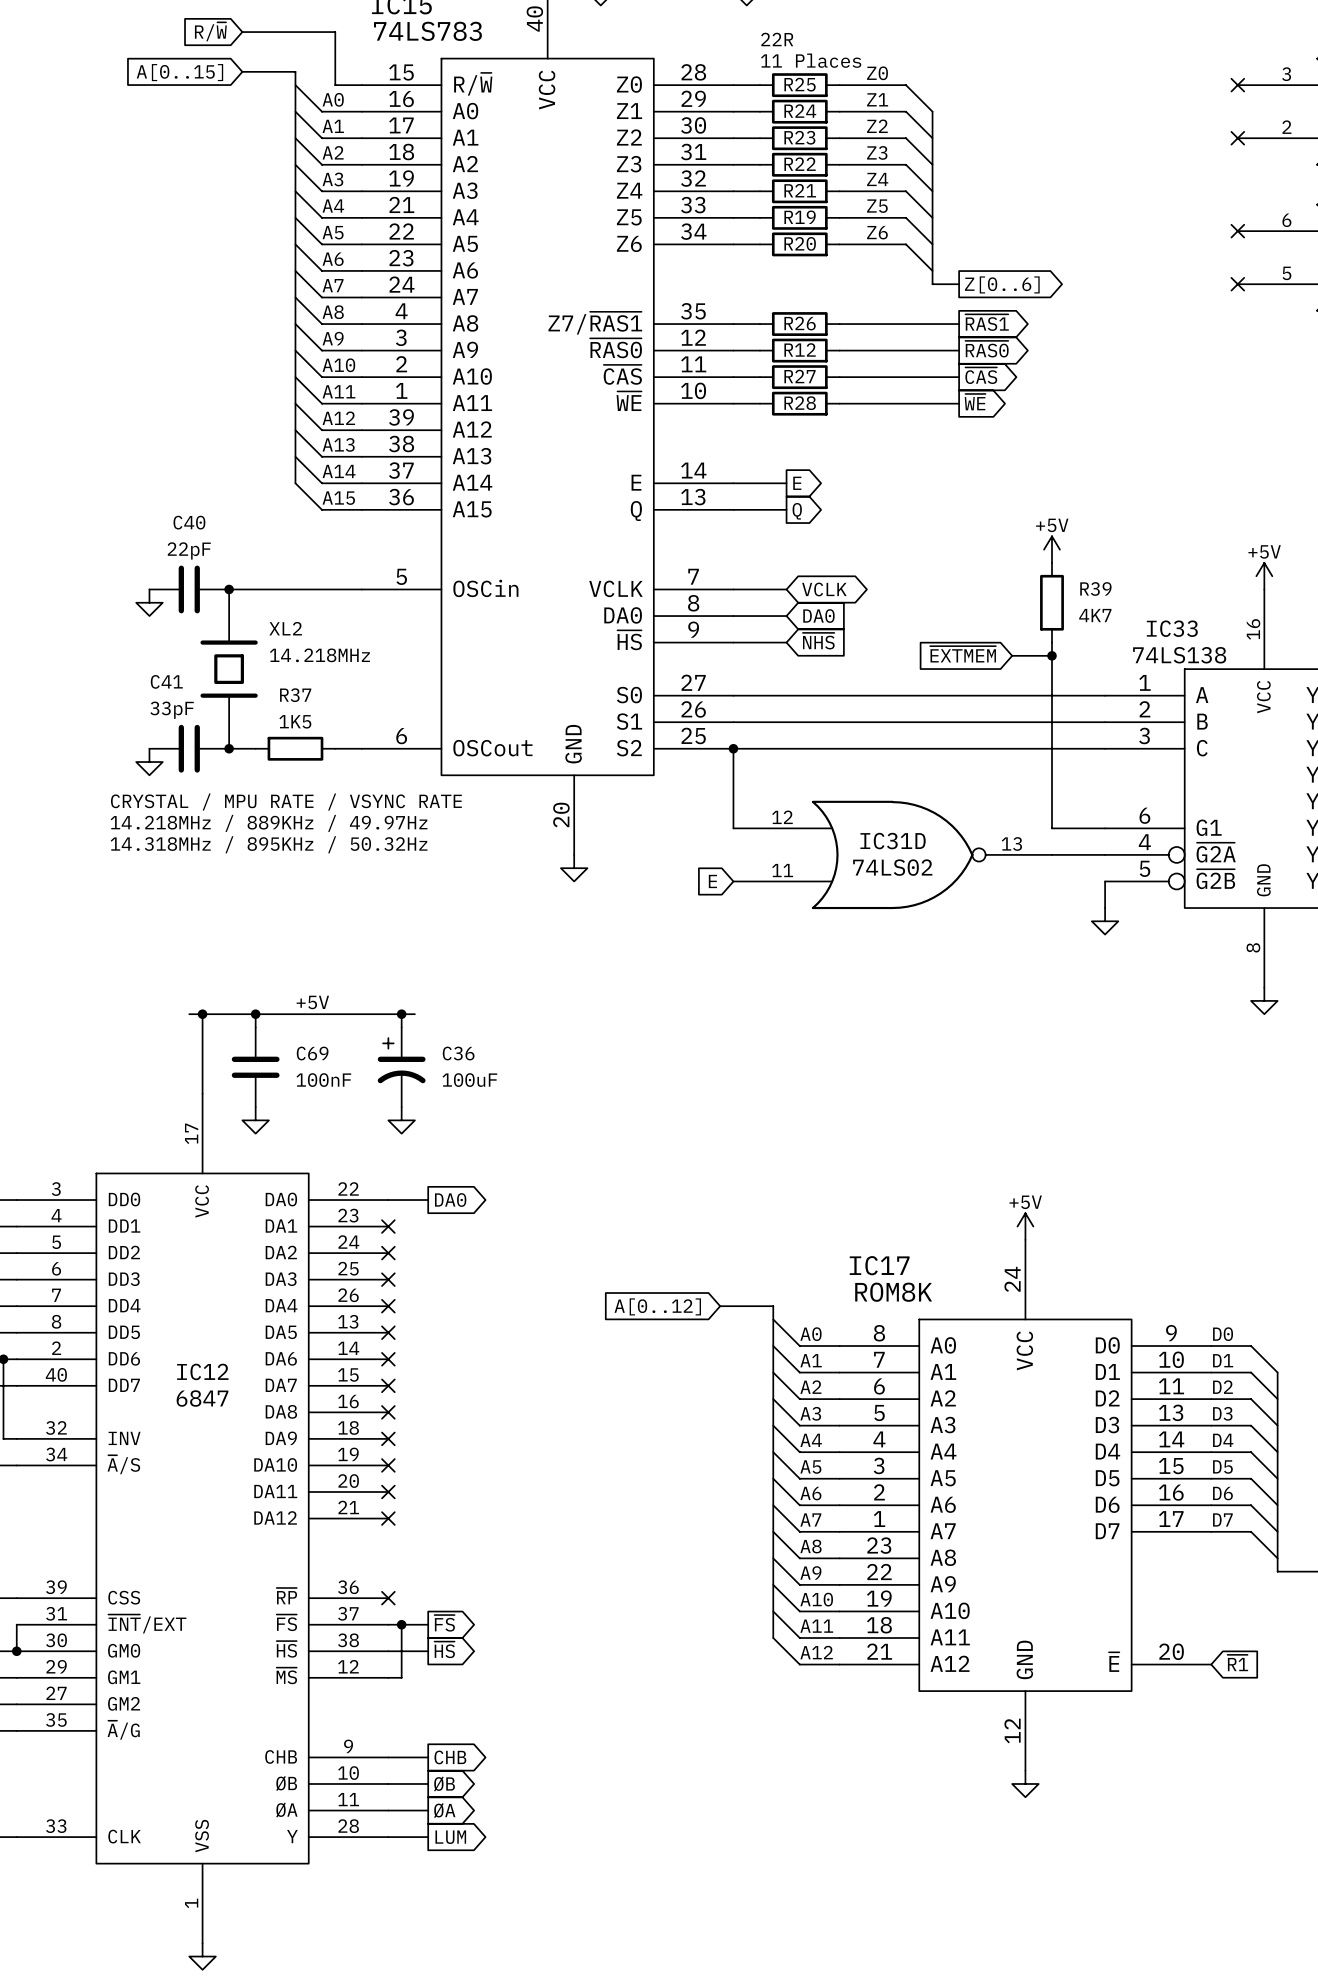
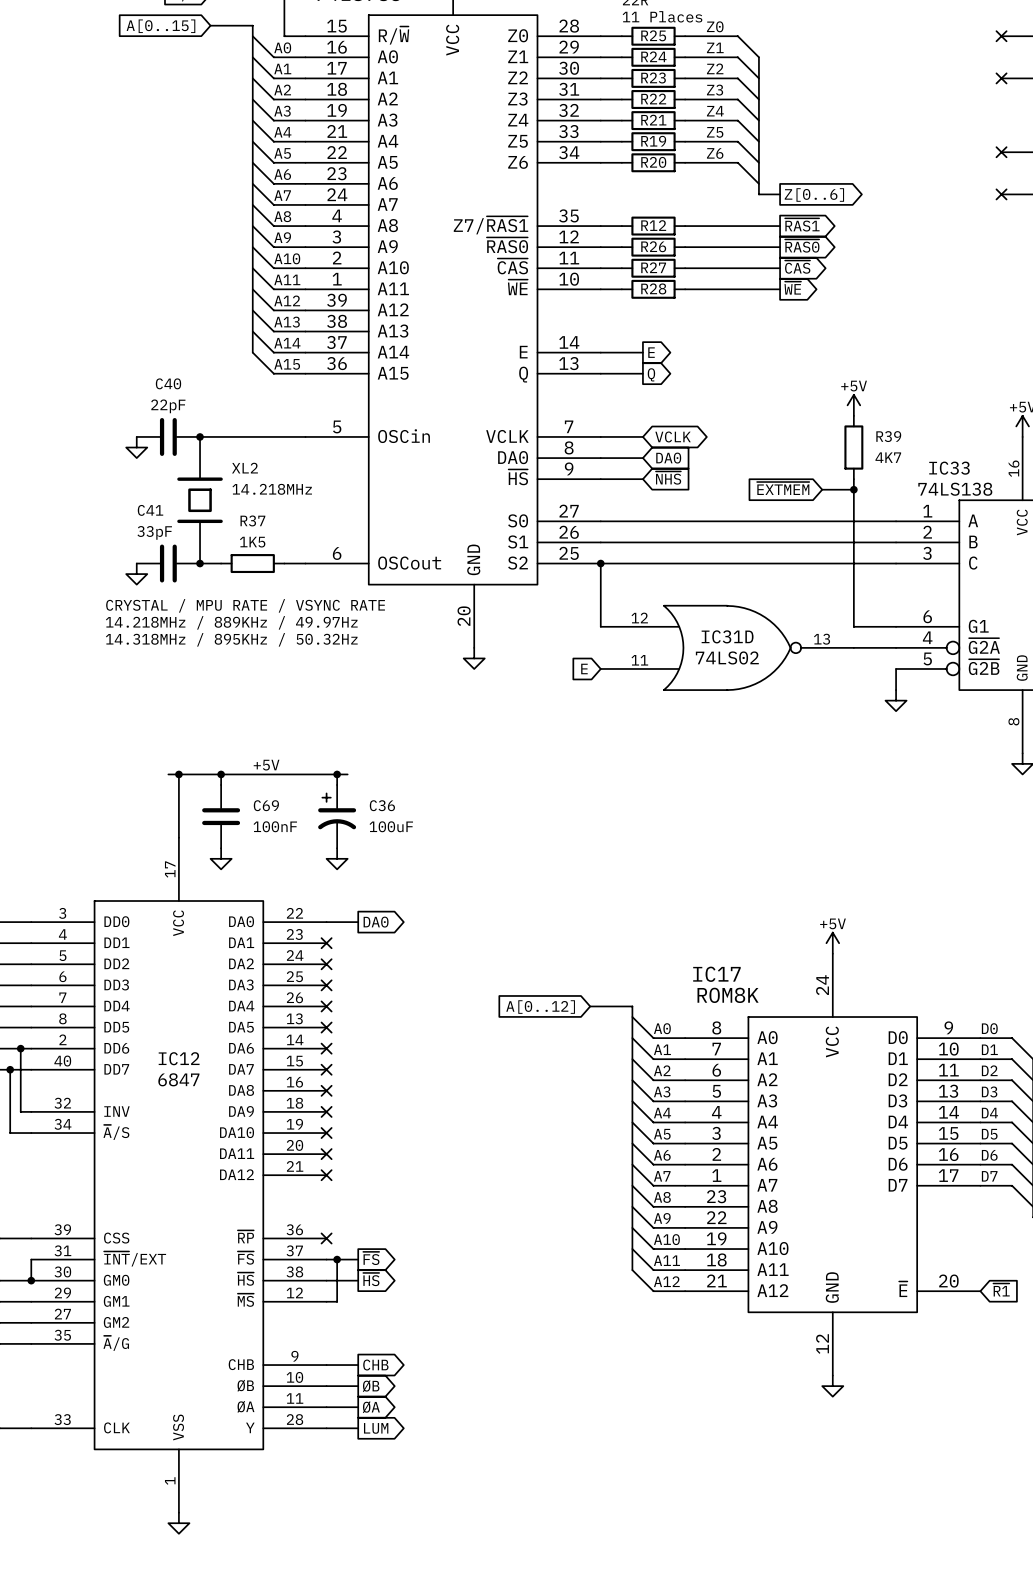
R26 name: R26 (800, 323) -> R12 (653, 225)
R12 name: R12 (800, 349) -> R26 (653, 246)

